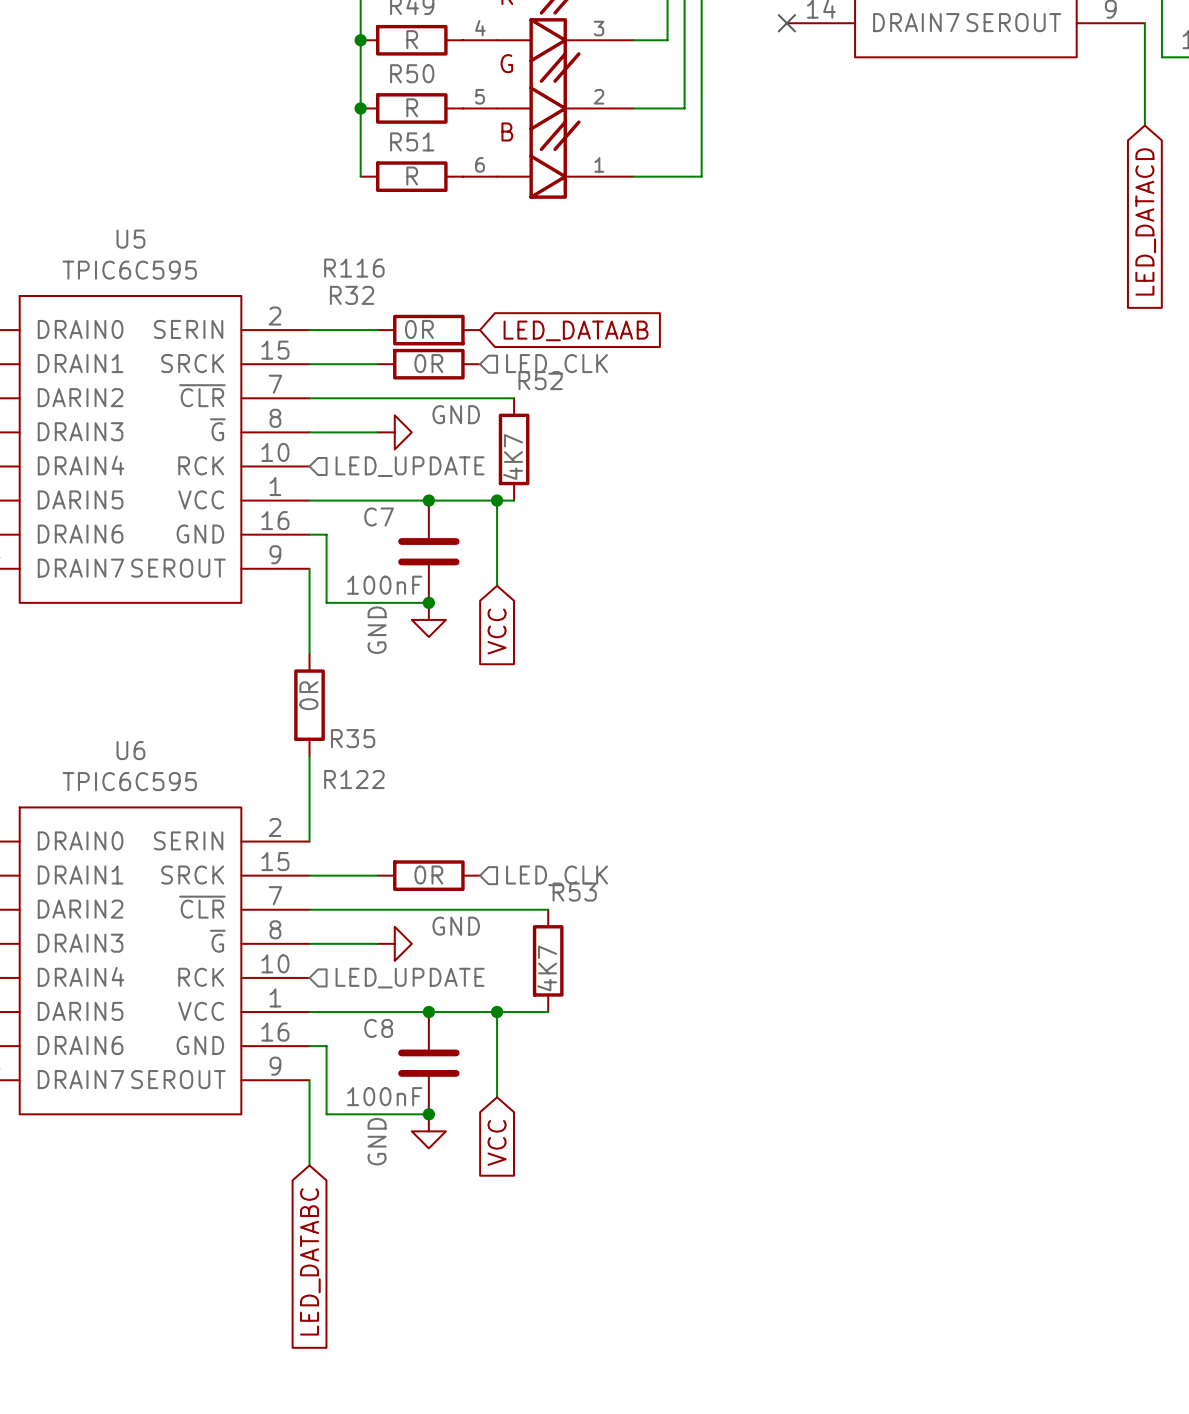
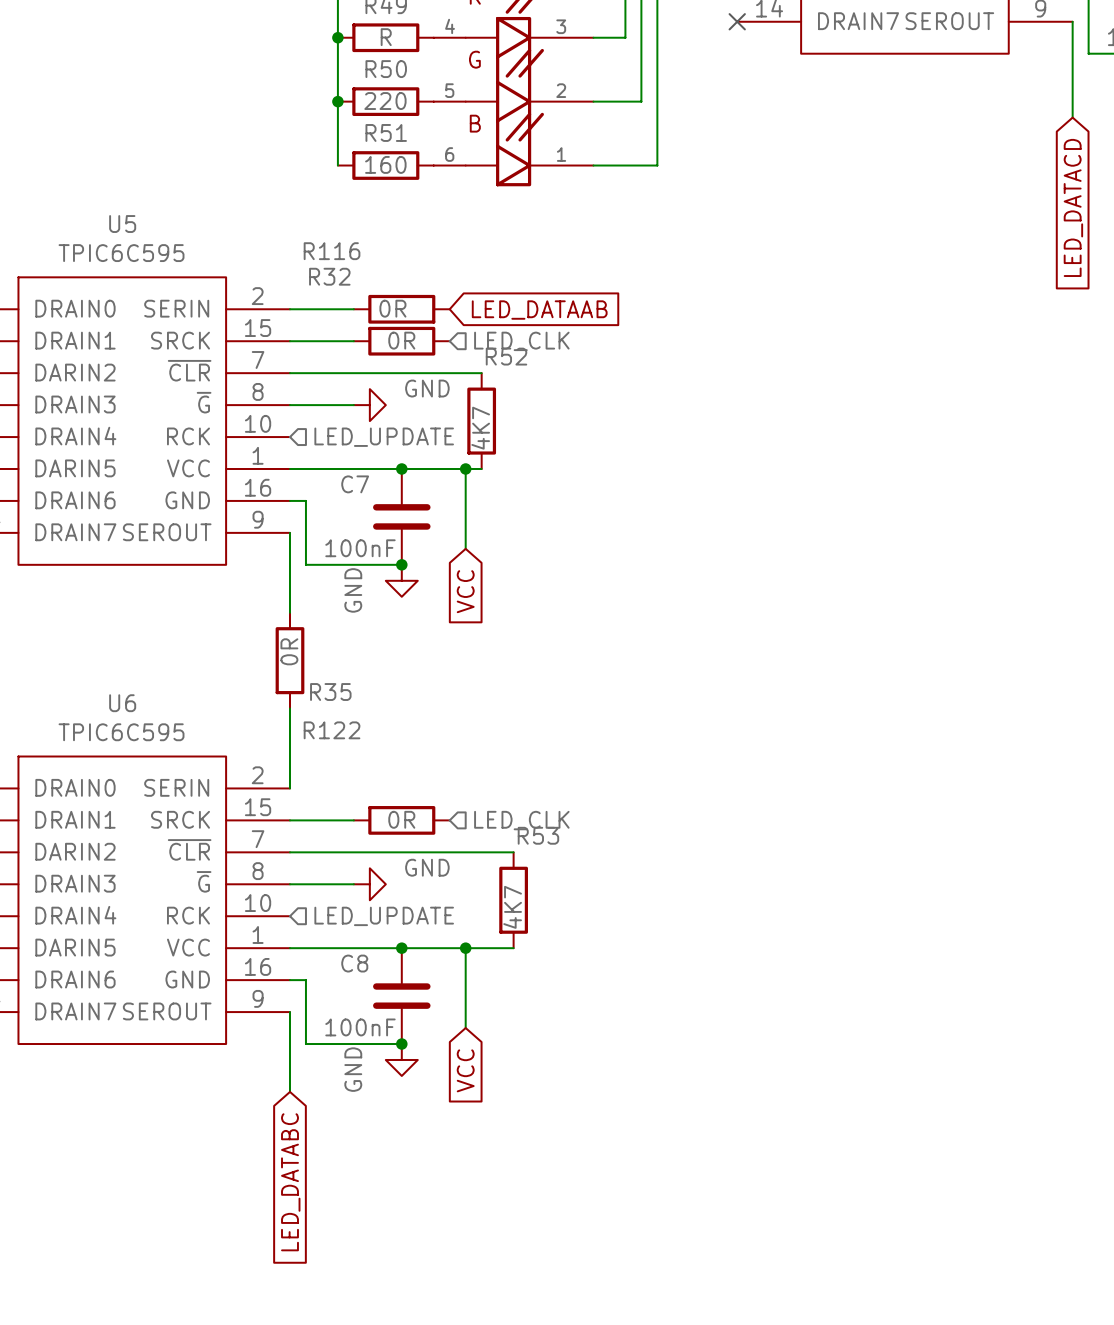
R50 value: R (412, 107) -> 220 (385, 101)
R51 value: R (412, 176) -> 160 (385, 164)

